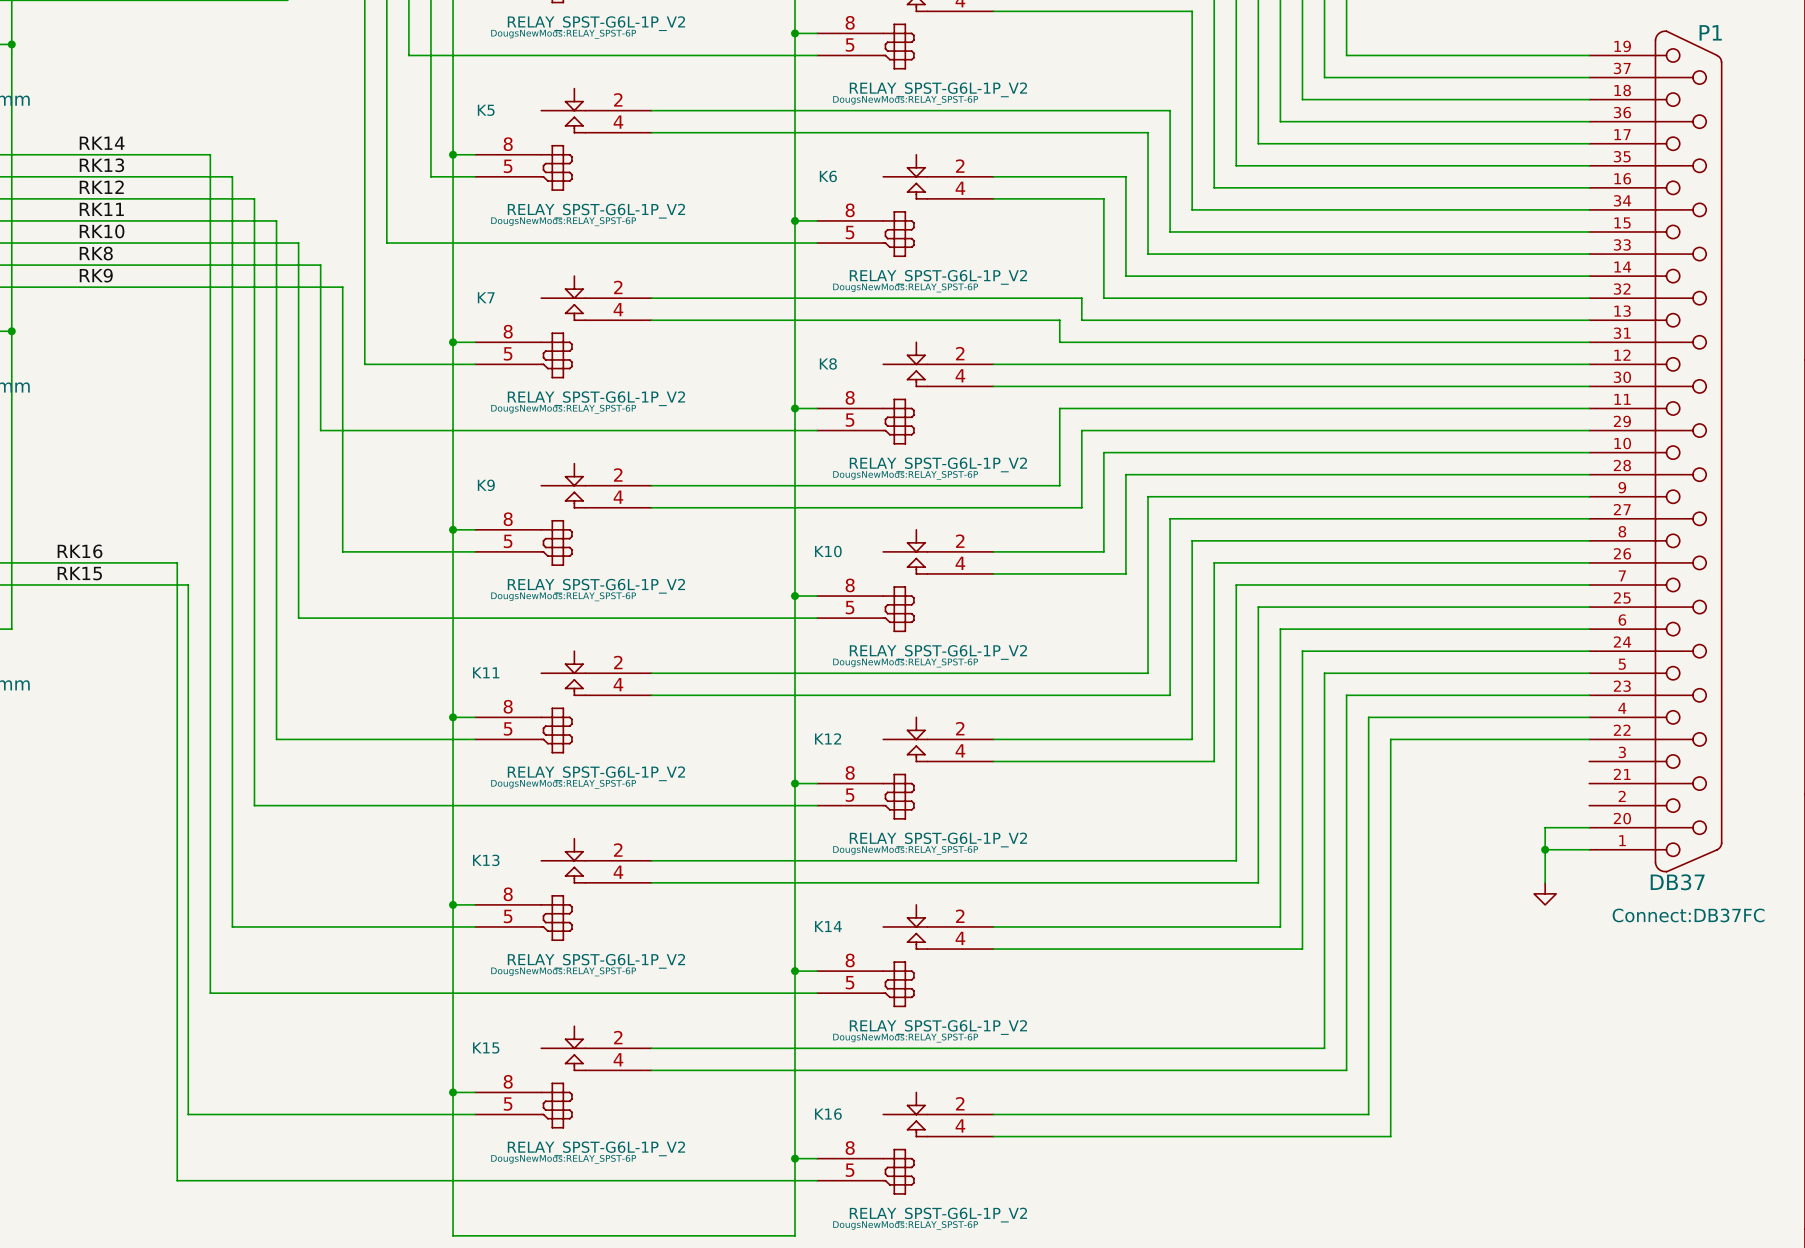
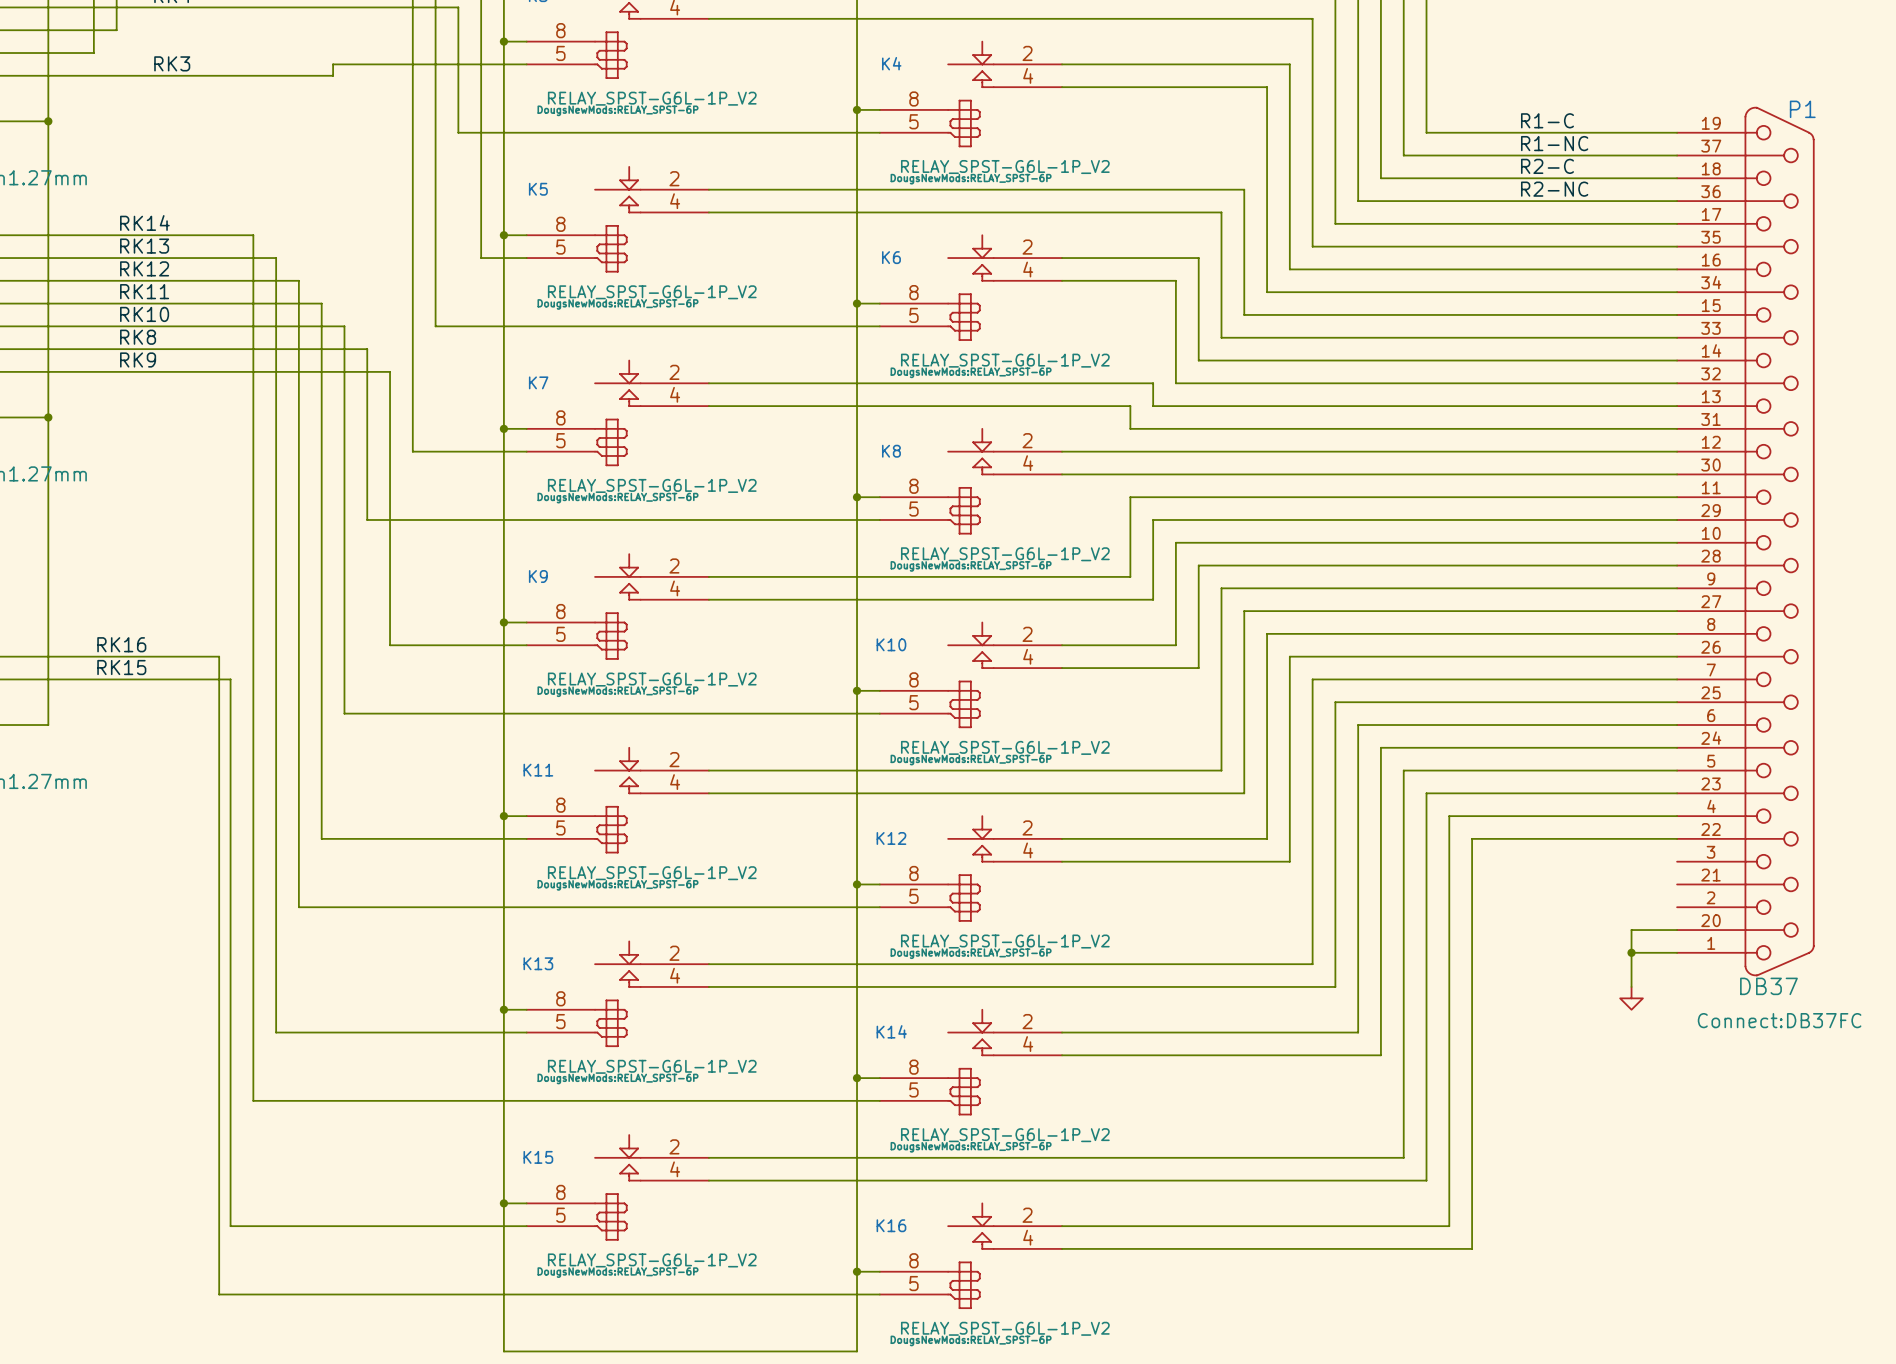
label: none -> R1-C (1547, 120)
label: none -> R1-NC (1554, 143)
label: none -> R2-C (1547, 166)
label: none -> R2-NC (1554, 189)

